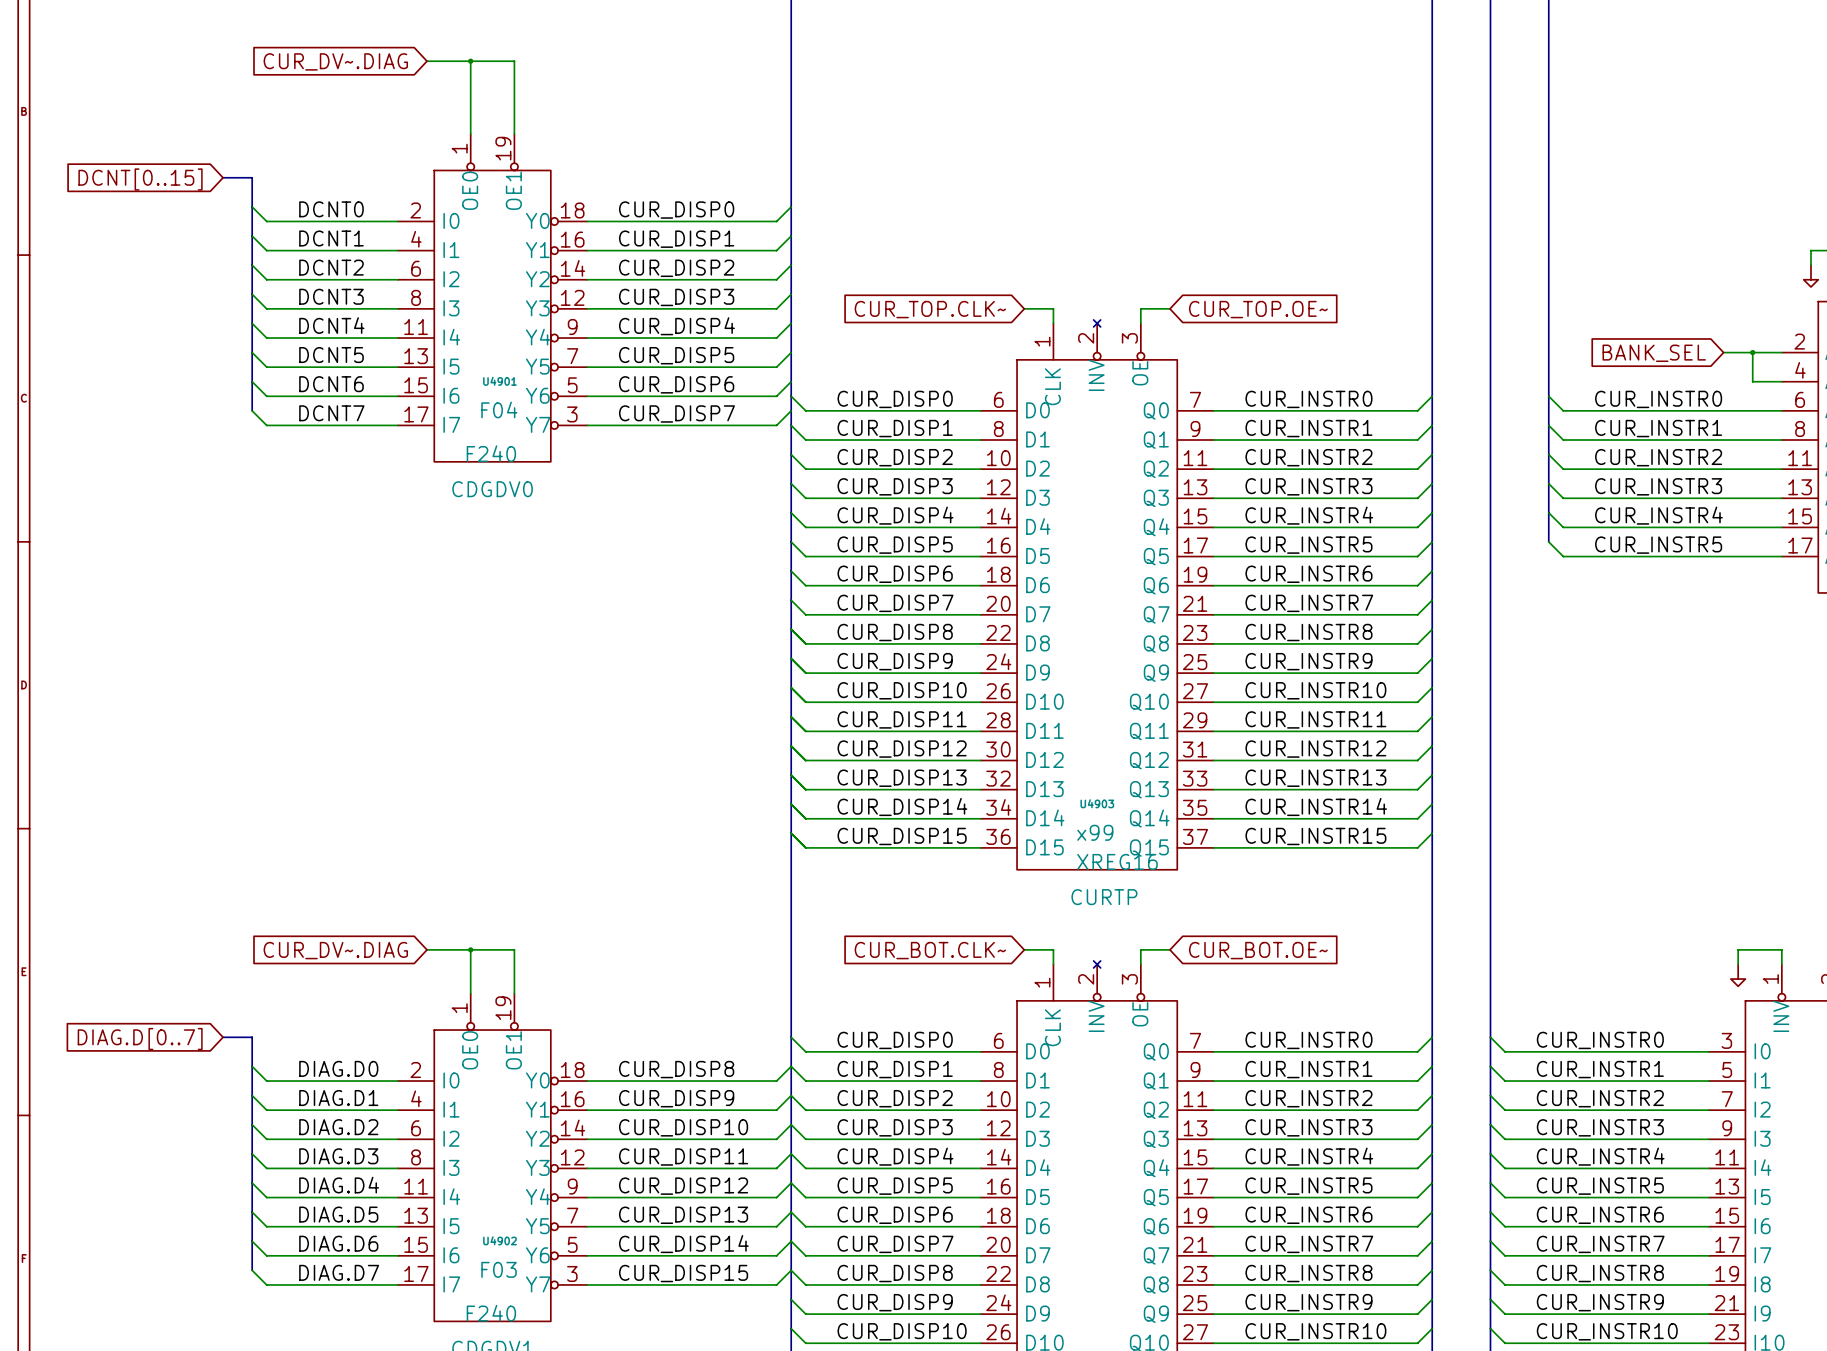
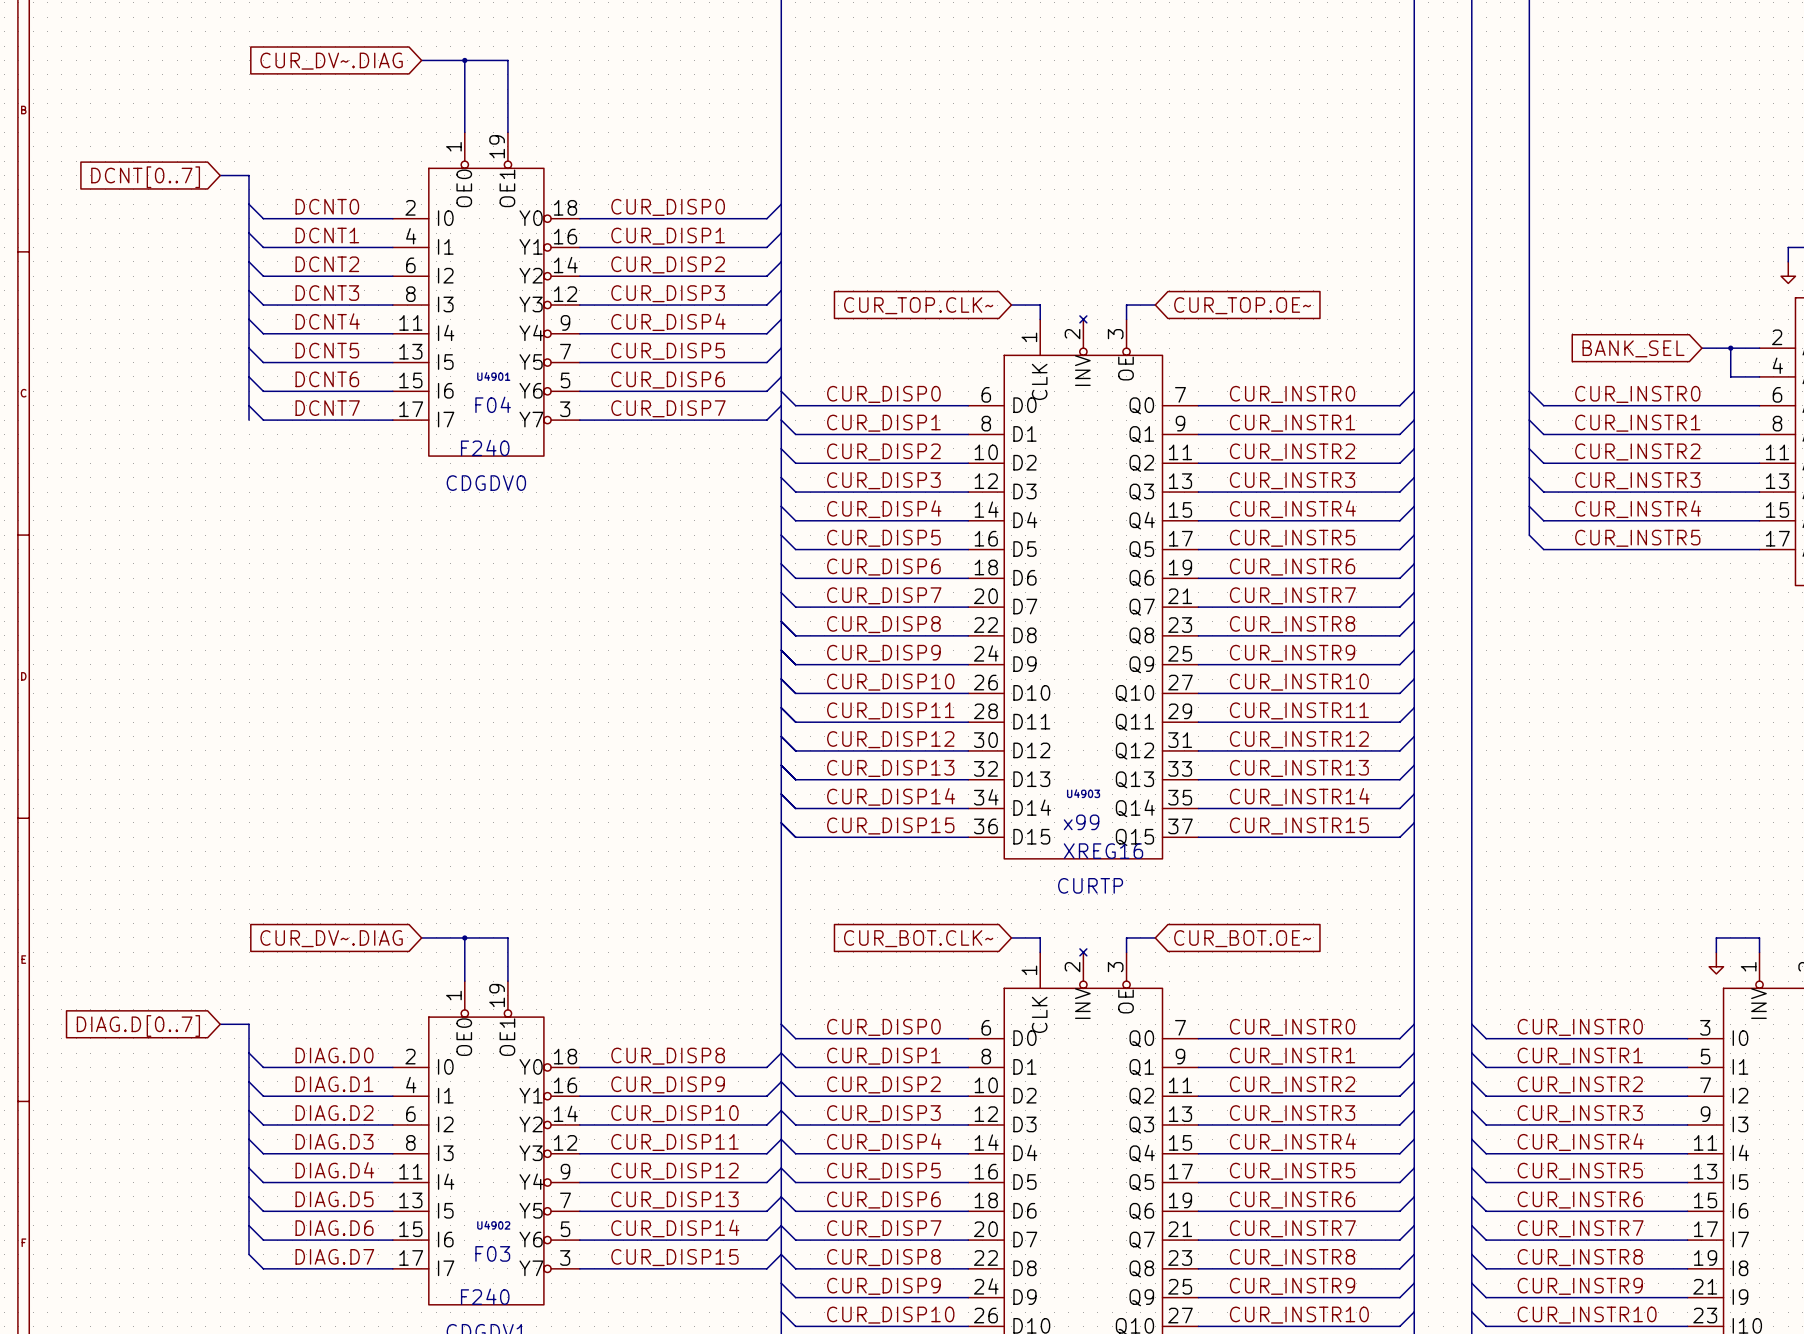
global label: DCNT[0..15] (140, 179) -> DCNT[0..7] (145, 177)
bus: none -> (249, 405) (249, 420)

